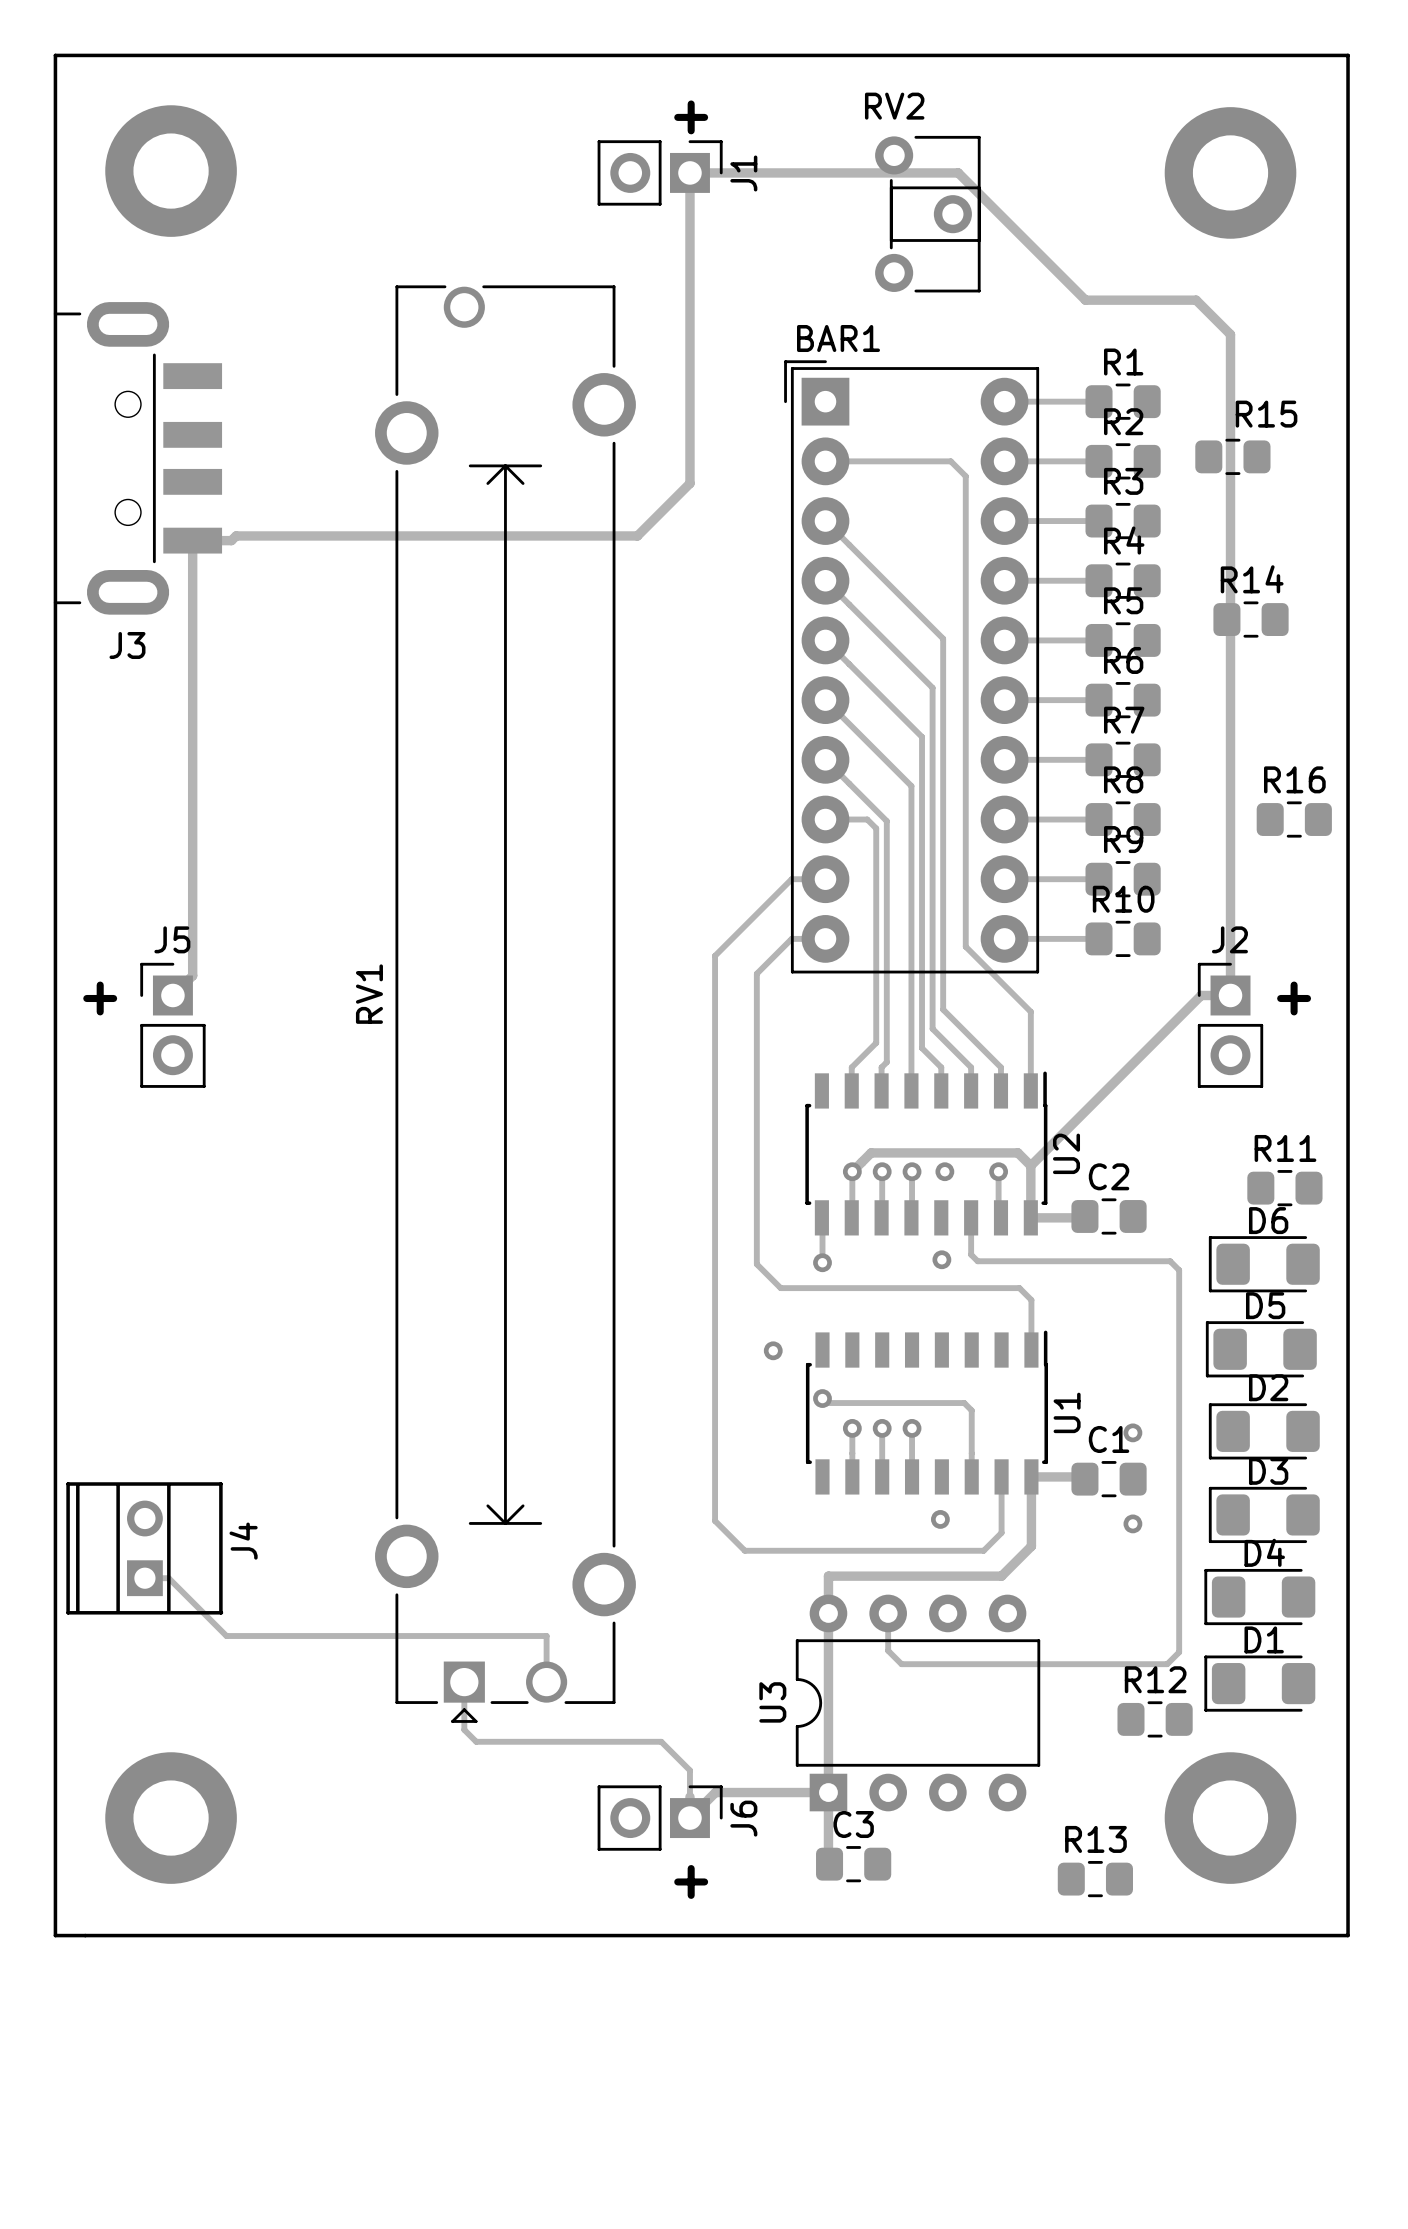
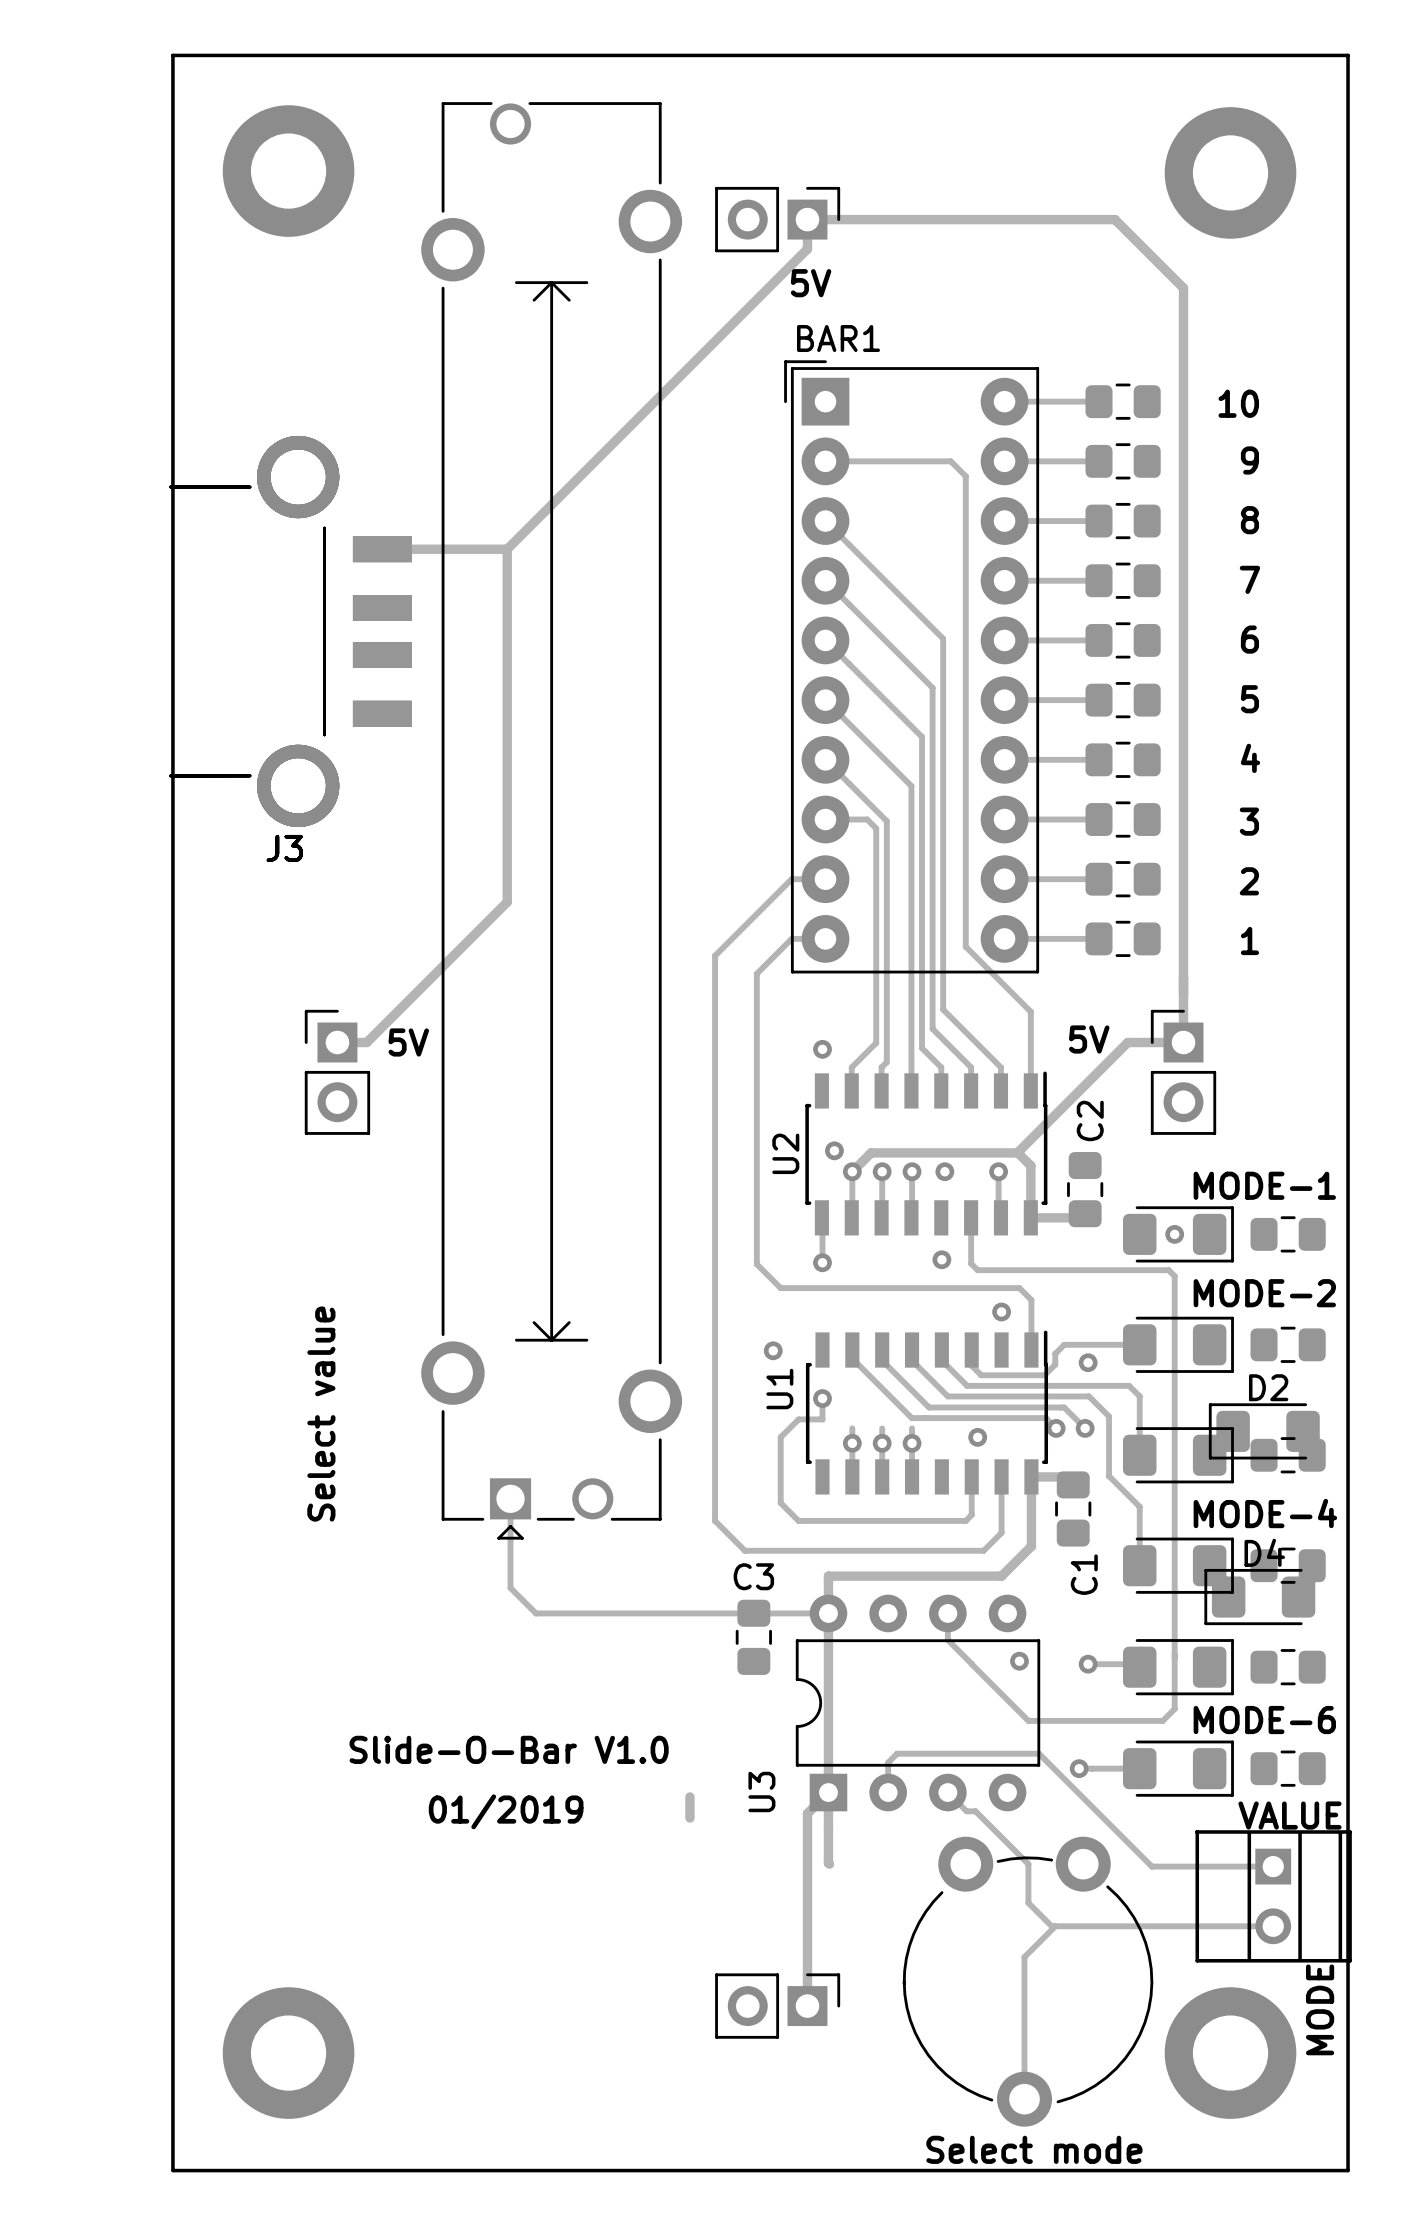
board edge: (172, 55) (55, 55) (55, 1935) (1347, 1935) -> (172, 55) (172, 2170)
text: + (691, 117) -> none
part position: (171, 171) -> (288, 171)
J1: (660, 172) -> none
RV2: (927, 214) -> none
part: none -> (777, 219)
text: none -> 5V (811, 283)
R1 name: R1 (1123, 362) -> none
text: none -> 10 (1238, 403)
R2 name: R2 (1123, 421) -> none
R15: (1232, 456) -> none
J3: (137, 458) -> none
text: none -> 9 (1249, 460)
R3 name: R3 (1123, 481) -> none
text: none -> 8 (1249, 520)
R4 name: R4 (1124, 540) -> none
track: none -> (382, 549) (507, 549)
track: none -> (507, 549) (807, 248) (807, 219) (1115, 219) (1183, 288) (1183, 1042) (1127, 1042) (1017, 1152)
track: none -> (507, 549) (507, 902) (366, 1042) (337, 1042)
text: none -> 7 (1249, 579)
R5 name: R5 (1123, 600) -> none
R14: (1251, 619) -> none
J3: none -> (290, 631)
text: none -> 6 (1249, 639)
R6 name: R6 (1123, 660) -> none
text: none -> 5 (1249, 699)
R7 name: R7 (1124, 720) -> none
text: none -> 4 (1250, 758)
R8 name: R8 (1123, 779) -> none
R16: (1294, 819) -> none
part: none -> (551, 820)
text: none -> 3 (1249, 821)
R9 name: R9 (1123, 839) -> none
text: none -> 2 (1249, 881)
R10 name: R10 (1123, 899) -> none
text: none -> 1 (1249, 941)
track: (172, 995) (192, 975) (192, 540) (231, 540) (236, 535) (637, 535) (689, 483) (689, 172) (958, 172) (1085, 300) (1196, 300) (1230, 334) (1230, 995) (1201, 995) (1030, 1165) -> none
text: + (100, 998) -> none
text: + (1294, 998) -> none
RV1: (505, 1004) -> none
J5: (172, 1025) -> none
J2: (1230, 1025) -> none
text: none -> 5V (1089, 1039)
text: none -> 5V (408, 1042)
via: none -> (822, 1049)
part: none -> (337, 1072)
part: none -> (1183, 1072)
via: none -> (834, 1150)
U2 name position: U2 (1066, 1153) -> U2 (785, 1153)
text: none -> MODE-1 (1264, 1185)
R11: (1284, 1188) -> none
C2 rotation: 0° (1109, 1216) -> 90° clockwise (1085, 1189)
via: none -> (1174, 1234)
part: none -> (1178, 1234)
part: none -> (1288, 1234)
track: (971, 1254) (977, 1261) (1170, 1261) (1179, 1270) (1179, 1652) (1167, 1664) (1136, 1664) -> (971, 1254) (971, 1263) (977, 1270) (1168, 1270) (1174, 1276) (1174, 1708) (1162, 1720) (1028, 1720) (947, 1640) (947, 1613)
D6: (1264, 1264) -> none
text: none -> MODE-2 (1264, 1293)
via: none -> (1001, 1311)
track: none -> (1139, 1344) (1064, 1344) (1055, 1353) (1055, 1364) (1044, 1375) (981, 1375) (971, 1365) (971, 1350)
part: none -> (1178, 1344)
part: none -> (1288, 1344)
D5: (1261, 1349) -> none
track: none -> (852, 1350) (852, 1358) (911, 1418) (1045, 1418) (1056, 1428)
track: none -> (882, 1350) (882, 1360) (929, 1407) (1064, 1407) (1085, 1428)
track: none -> (912, 1350) (912, 1360) (947, 1396) (1089, 1396) (1109, 1416) (1109, 1476) (1139, 1506) (1139, 1565)
track: none -> (941, 1350) (941, 1360) (967, 1385) (1129, 1385) (1139, 1396) (1139, 1455)
via: none -> (1088, 1362)
track: (826, 1403) (964, 1403) (971, 1410) (971, 1476) -> (822, 1398) (822, 1419) (798, 1419) (780, 1437) (780, 1503) (798, 1520) (965, 1520) (971, 1514) (971, 1476)
U1 name position: U1 (1067, 1412) -> U1 (779, 1389)
text: none -> Select value (321, 1414)
via position: (852, 1428) -> (852, 1443)
via position: (882, 1428) -> (882, 1443)
via position: (912, 1428) -> (912, 1443)
via: none -> (1056, 1428)
via: none -> (1085, 1428)
via: (1132, 1432) -> none
via: none -> (977, 1437)
C1 name position: C1 (1109, 1439) -> C1 (1084, 1574)
part: none -> (1178, 1455)
part: none -> (1288, 1455)
C1 rotation: 0° (1109, 1479) -> 90° clockwise (1073, 1508)
C1 position: (1109, 1479) -> (1073, 1508)
track: none -> (510, 1498) (510, 1588) (535, 1613) (828, 1613)
text: none -> MODE-4 (1265, 1513)
D3: (1264, 1514) -> none
via: (940, 1519) -> none
via: (1132, 1523) -> none
J4: (144, 1548) -> none
part: none -> (1178, 1565)
part: none -> (1288, 1565)
track: (144, 1578) (168, 1578) (226, 1636) (546, 1636) (546, 1682) -> none
track: (888, 1613) (888, 1650) (901, 1664) (1088, 1664) -> none
via: none -> (1019, 1661)
via: none -> (1088, 1664)
part: none -> (1178, 1667)
part: none -> (1288, 1667)
track: (464, 1682) (464, 1729) (476, 1741) (661, 1741) (689, 1770) (689, 1818) (715, 1792) (828, 1792) -> (807, 2006) (807, 1813) (828, 1792)
D1: (1259, 1683) -> none
U3 name position: U3 (772, 1702) -> U3 (761, 1791)
R12: (1155, 1719) -> none
text: none -> MODE-6 (1264, 1720)
text: none -> Slide-O-Bar V1.0 (509, 1749)
track: none -> (1079, 1768) (1139, 1768)
via: none -> (1079, 1768)
part: none -> (1178, 1768)
part: none -> (1288, 1768)
track: none -> (888, 1792) (888, 1762) (897, 1753) (1039, 1753) (1151, 1866) (1273, 1866)
track: none -> (947, 1792) (966, 1811) (975, 1811) (1028, 1864) (1028, 1902) (1051, 1926) (1273, 1926)
text: none -> 01/2019 (506, 1811)
text: none -> VALUE (1289, 1815)
part position: (171, 1818) -> (288, 2053)
J6: (660, 1818) -> none
part position: (1230, 1818) -> (1230, 2053)
C3 rotation: 0° (853, 1864) -> 90° clockwise (753, 1637)
C3 position: (853, 1864) -> (753, 1637)
R13: (1095, 1879) -> none
text: + (691, 1881) -> none
part: none -> (1273, 1896)
track: none -> (1055, 1926) (1024, 1957) (1024, 2099)
board edge: none -> (1348, 1935) (1348, 2170) (173, 2170)
part: none -> (1028, 1981)
part: none -> (777, 2006)
text: none -> MODE (1320, 2009)
text: none -> Select mode (1034, 2149)

